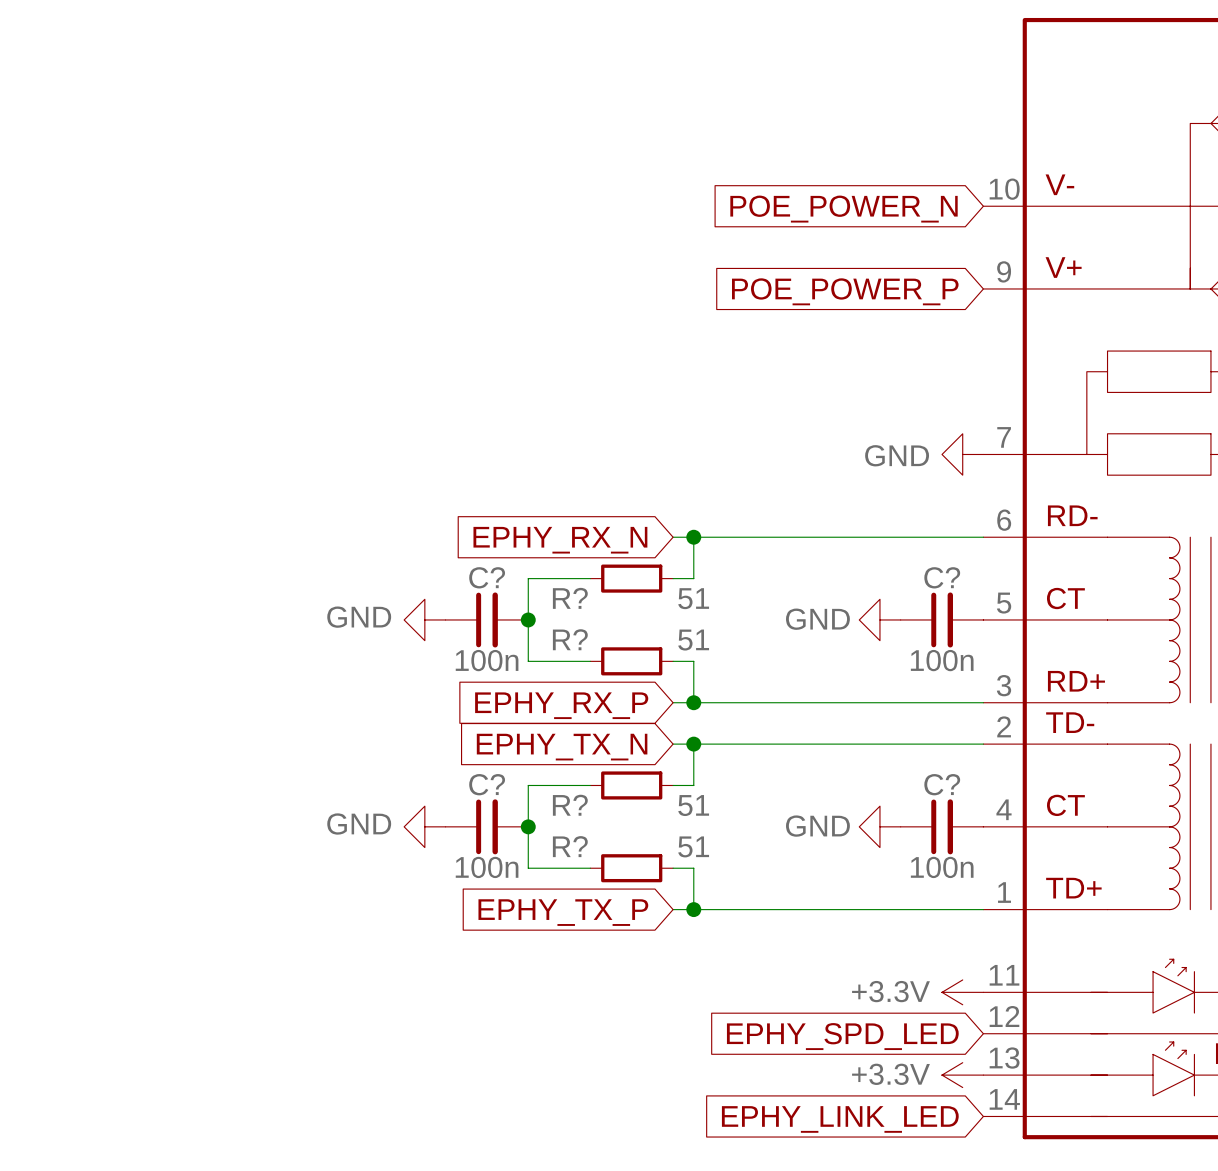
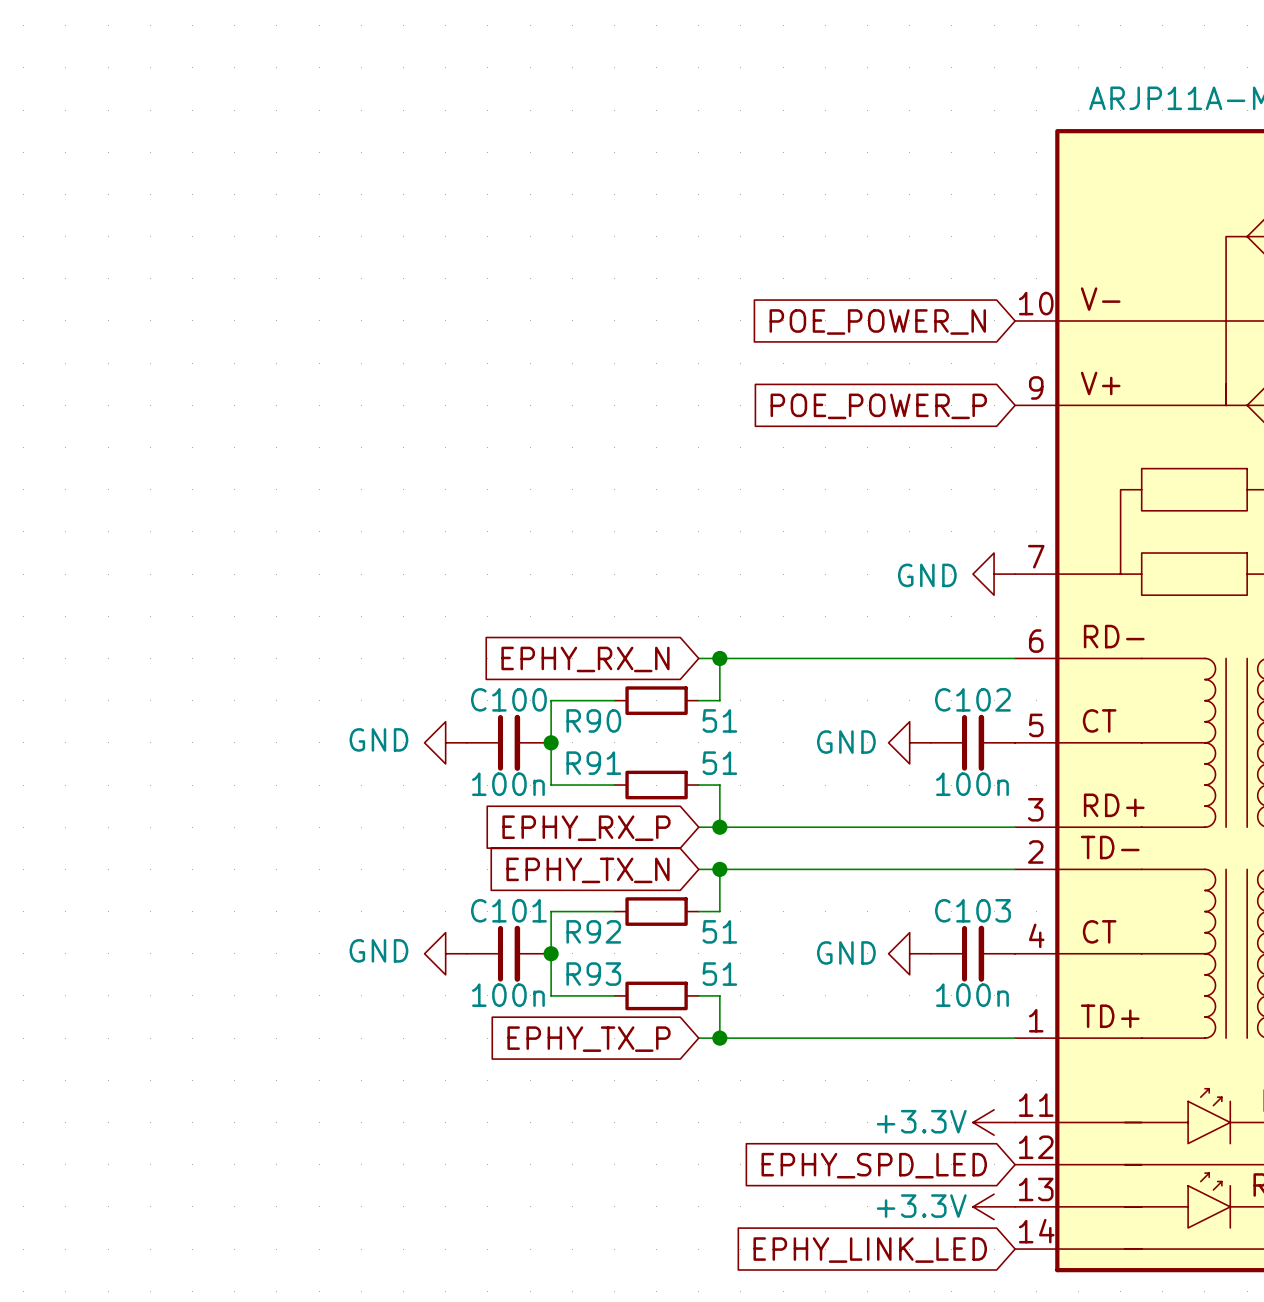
C? name: C? (487, 577) -> C100 (508, 699)
C? name: C? (942, 577) -> C102 (972, 699)
R? name: R? (570, 598) -> R90 (593, 720)
R? name: R? (570, 639) -> R91 (593, 763)
C? name: C? (487, 784) -> C101 (508, 910)
C? name: C? (942, 784) -> C103 (972, 910)
R? name: R? (570, 805) -> R92 (593, 931)
R? name: R? (570, 846) -> R93 (593, 974)

